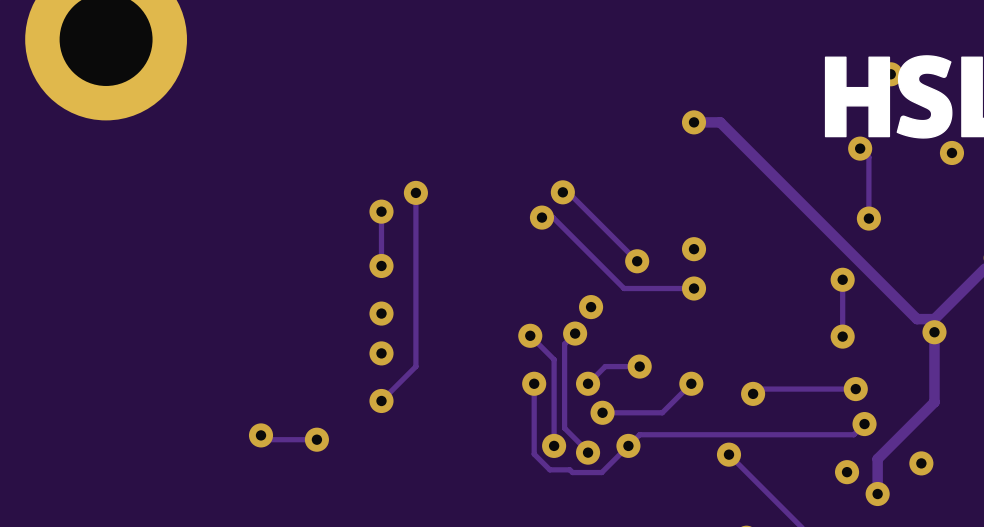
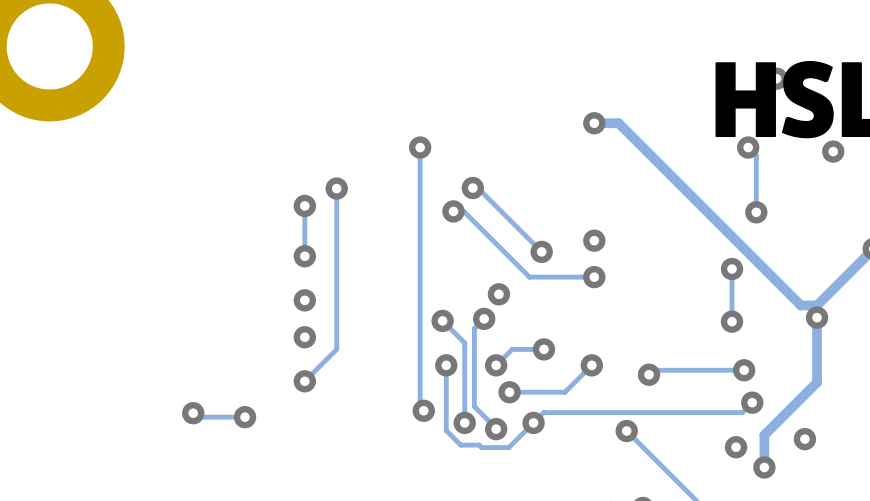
track: none -> (420, 147) (420, 407) (423, 410)
via: none -> (420, 147)
via: none -> (423, 410)

